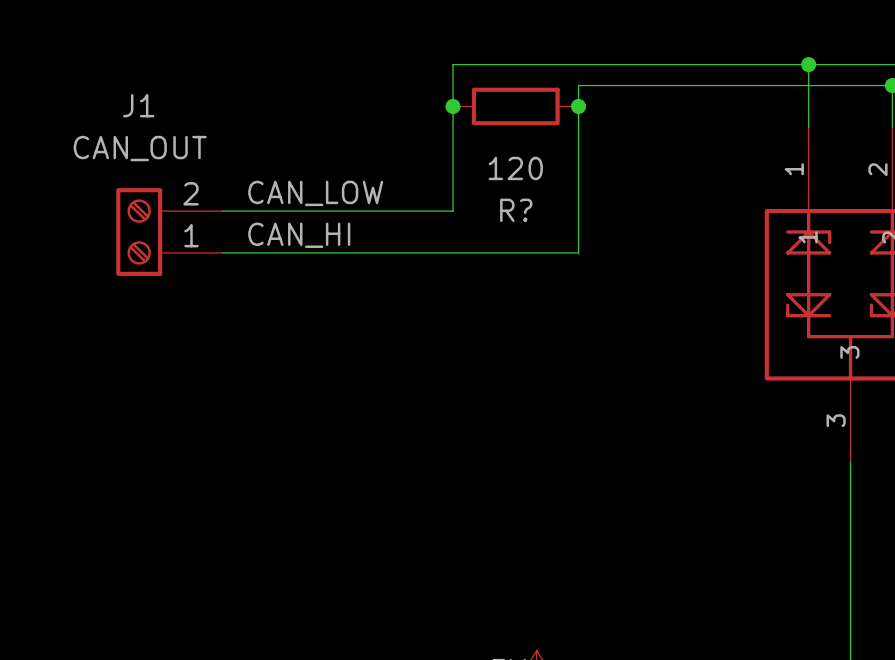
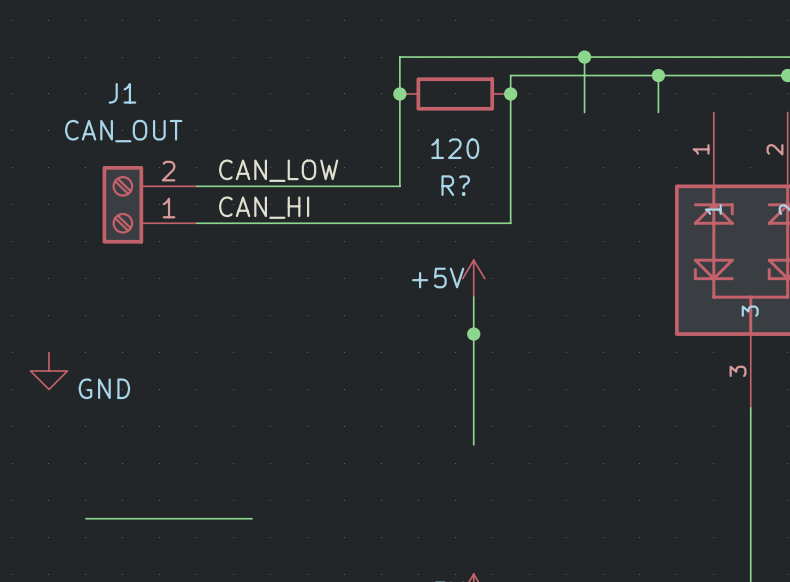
junction: none -> (584, 57)
wire: (808, 64) (808, 127) -> (584, 57) (584, 112)
junction position: (808, 64) -> (658, 75)
wire: (892, 85) (892, 127) -> (658, 75) (658, 112)
power symbol: none -> +5V (473, 278)
wire: none -> (473, 297) (473, 444)
junction: none -> (473, 334)
power symbol: none -> GND (48, 371)
wire: none -> (85, 518) (252, 518)

